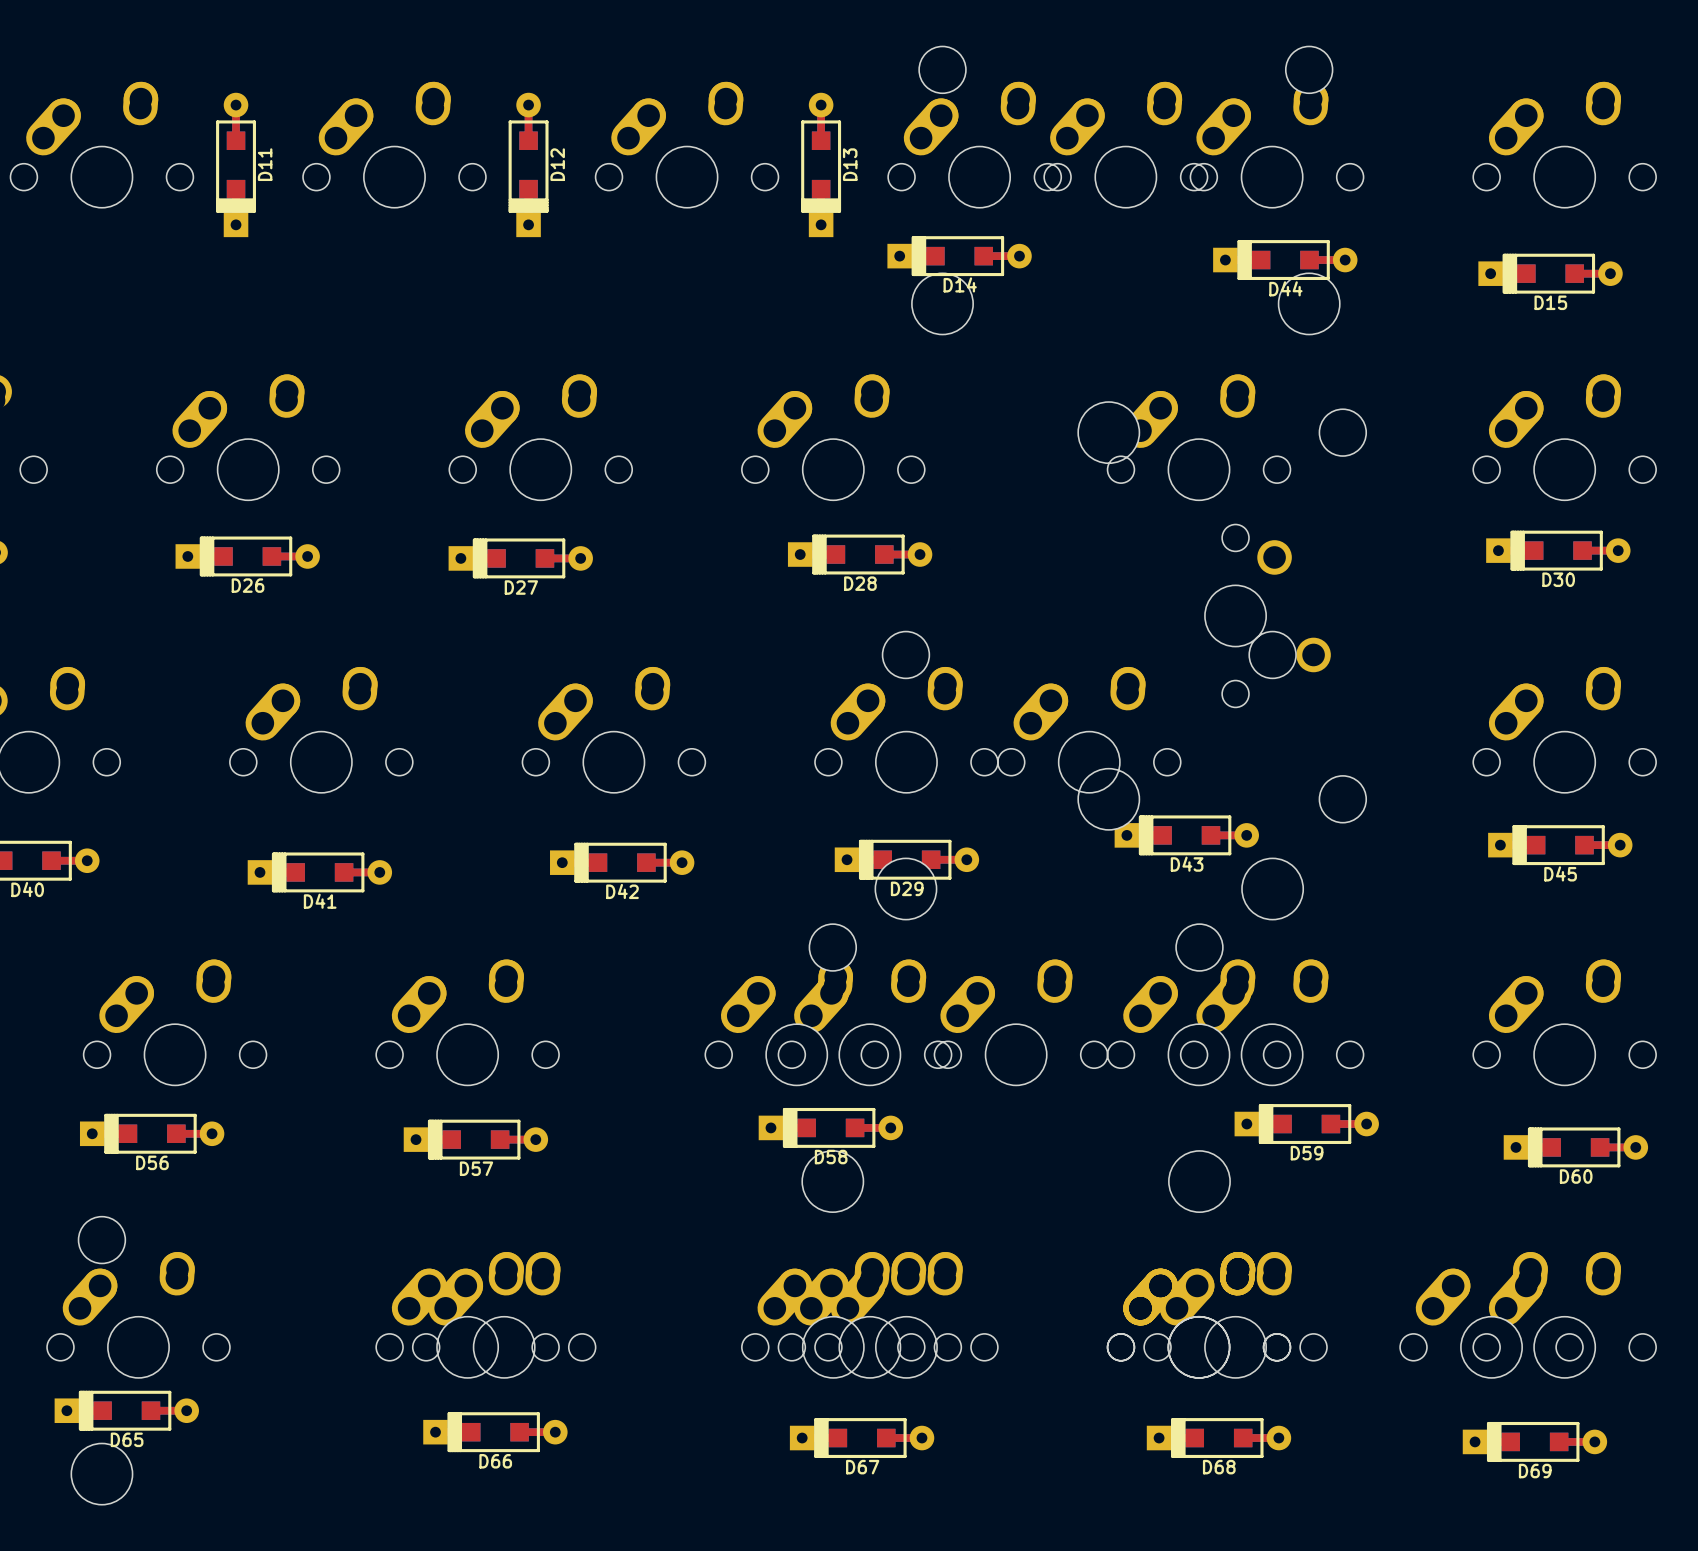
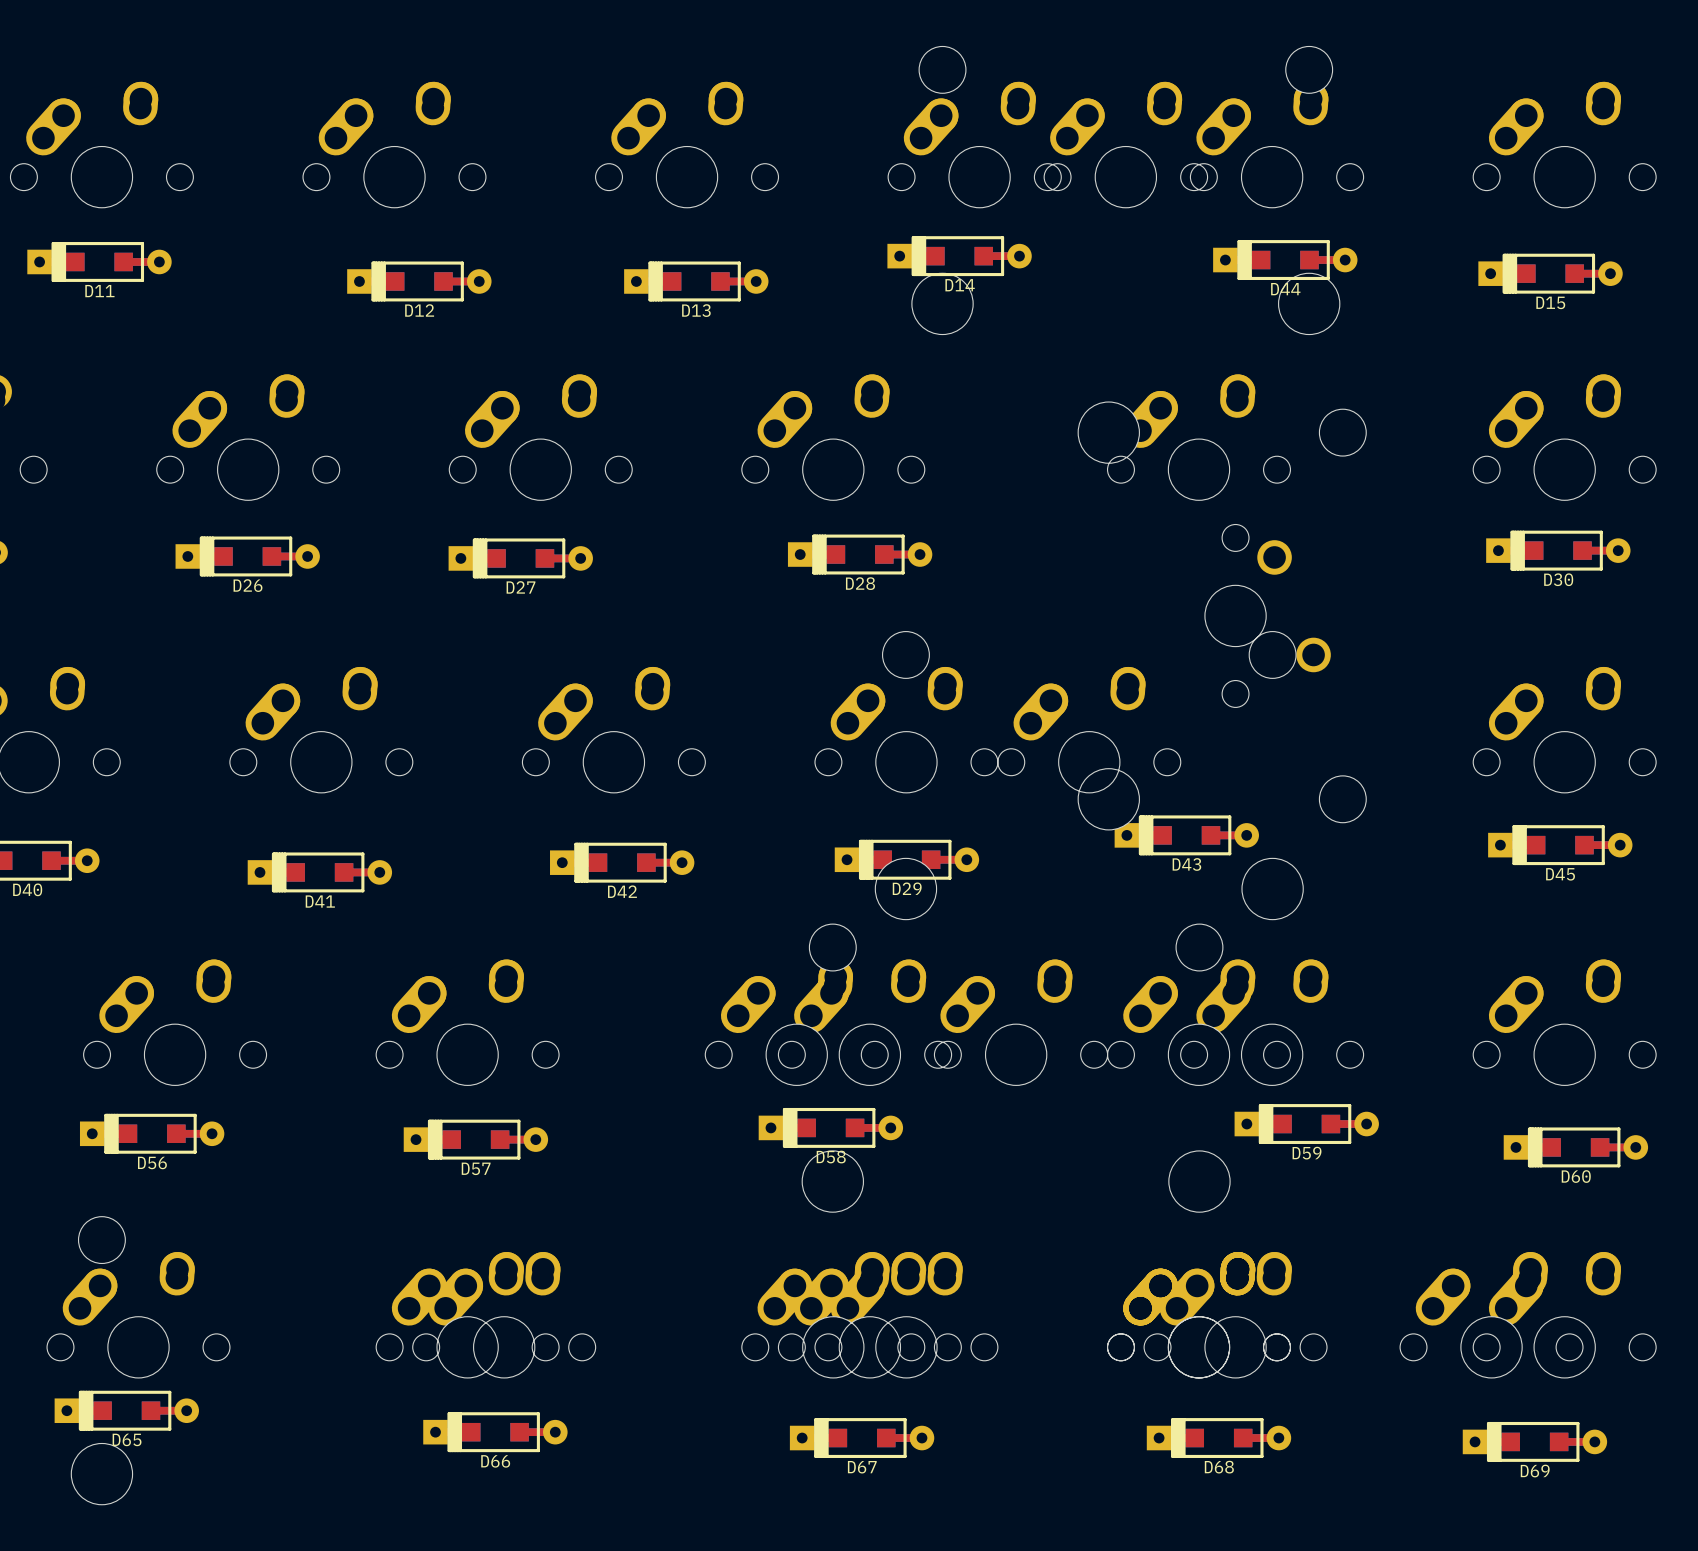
D11 rotation: 0° (236, 164) -> 90° clockwise (99, 261)
D11 position: (236, 164) -> (99, 261)
D12 rotation: 0° (528, 164) -> 90° clockwise (419, 281)
D12 position: (528, 164) -> (419, 281)
D13 rotation: 0° (821, 164) -> 90° clockwise (696, 281)
D13 position: (821, 164) -> (696, 281)

